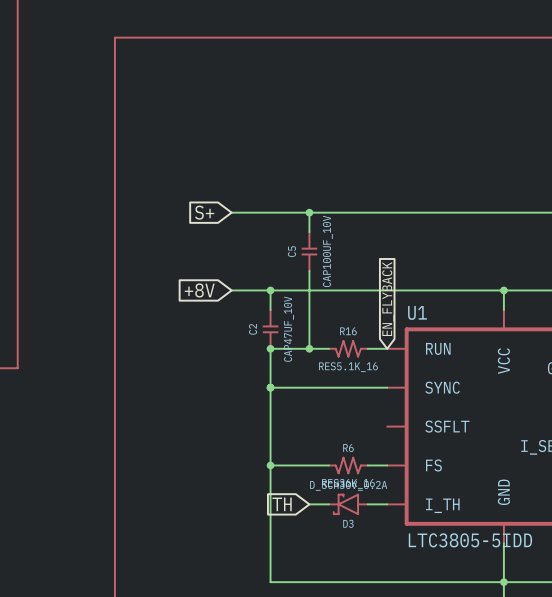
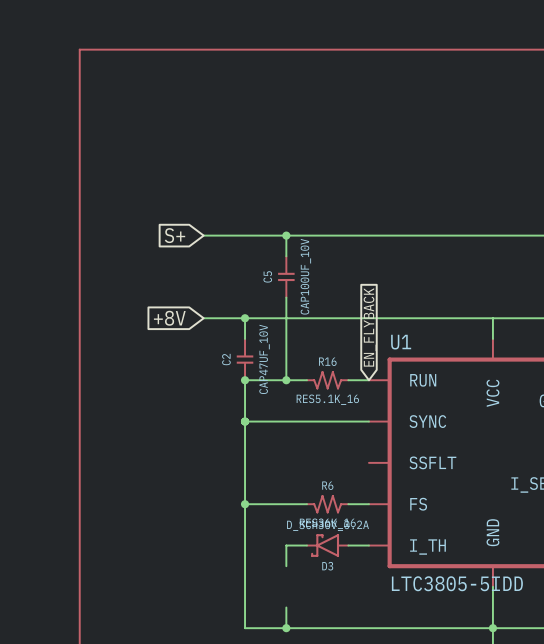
junction: (503, 290) -> none
global label: TH (282, 504) -> none
wire: none -> (286, 545) (286, 566)
wire: none -> (286, 607) (286, 628)
junction: none -> (286, 628)

